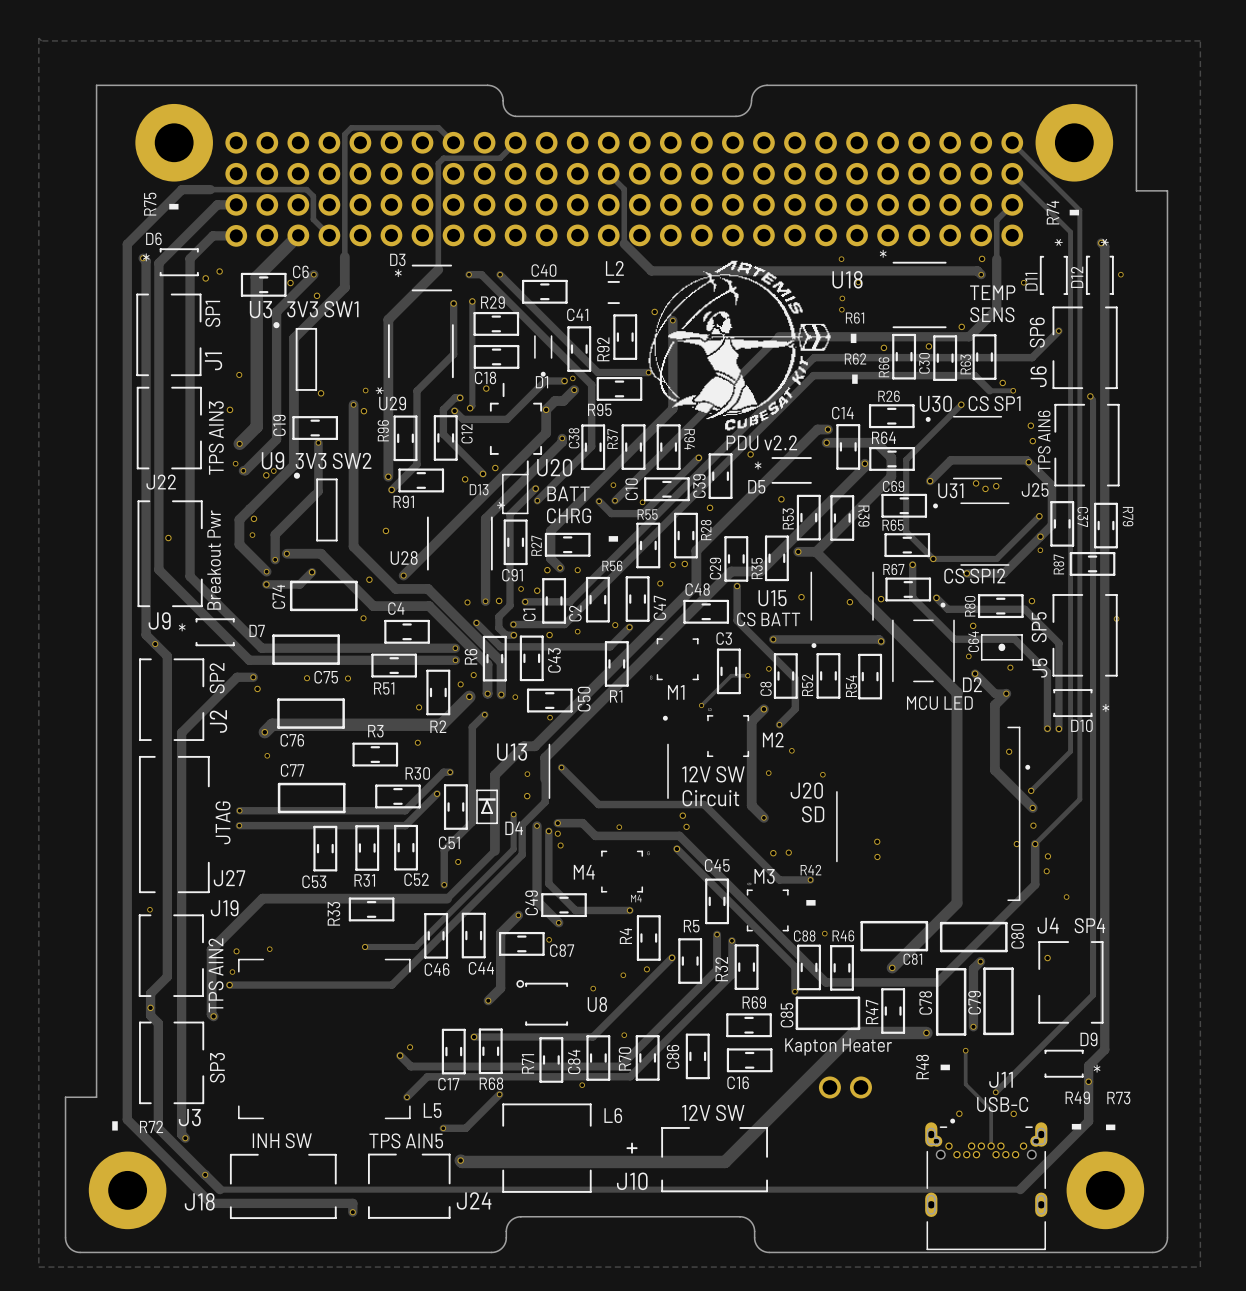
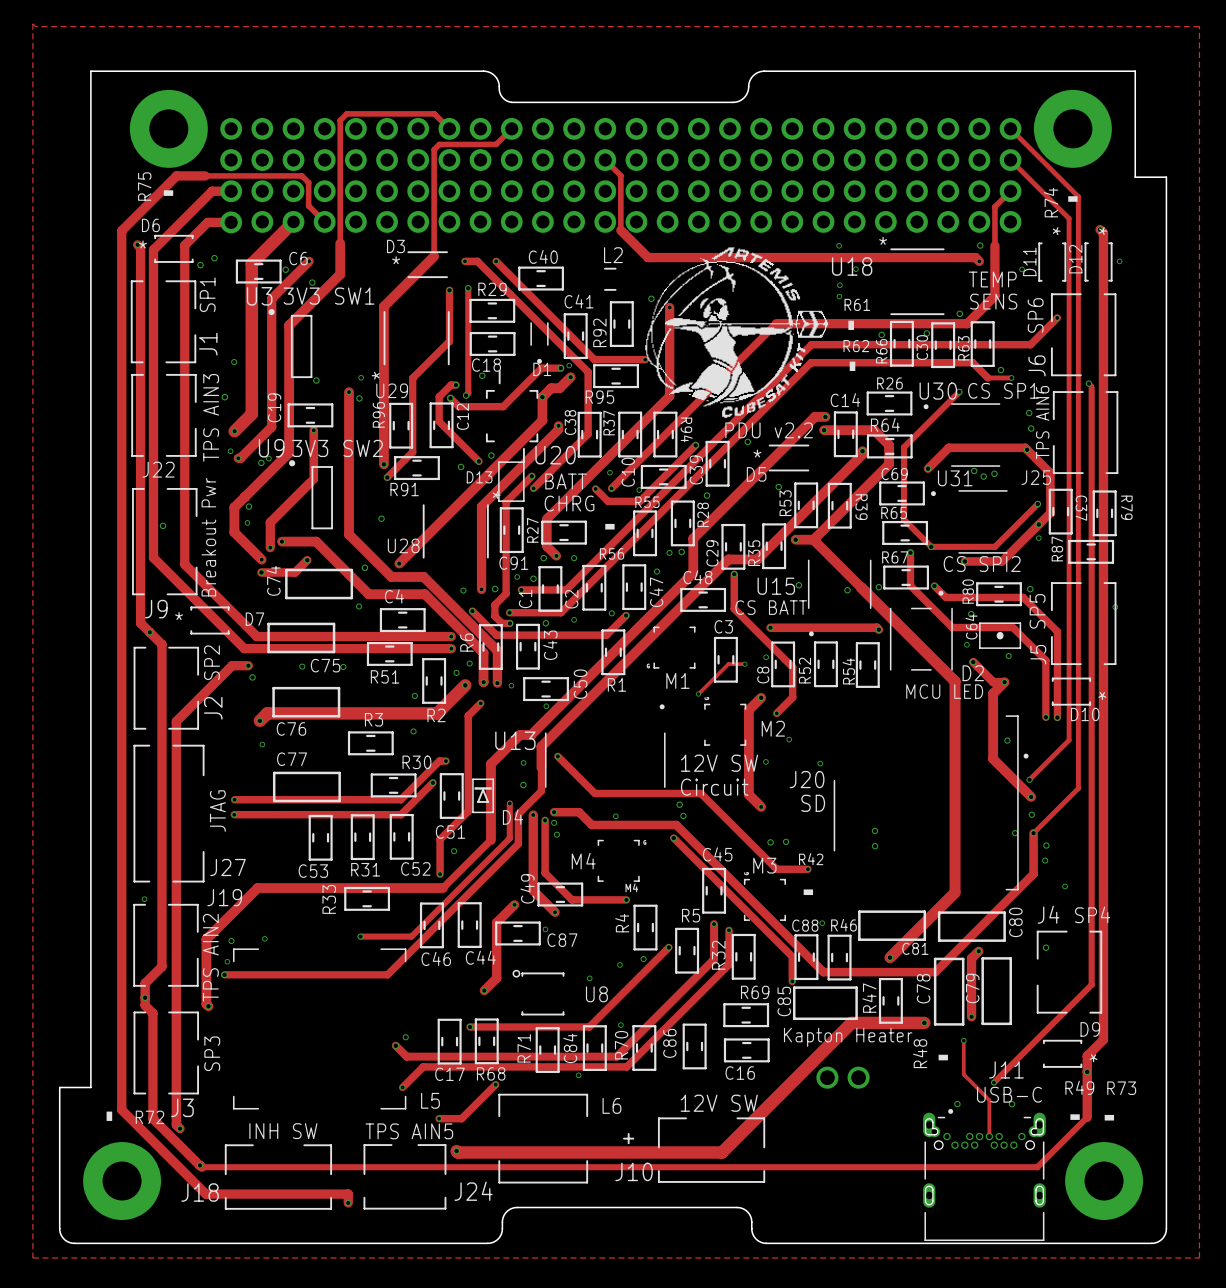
track: (1088, 1121) (1020, 1189) (220, 1189) (207, 1176) -> (1087, 1111) (1087, 1117) (1037, 1167) (201, 1167)

